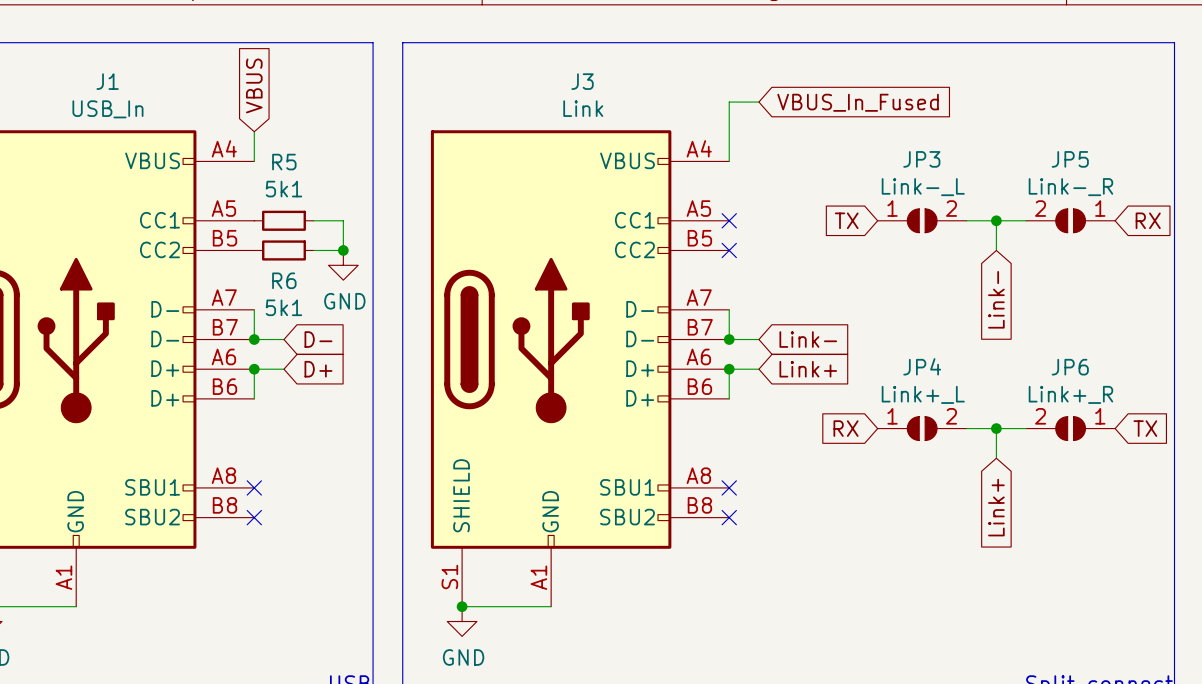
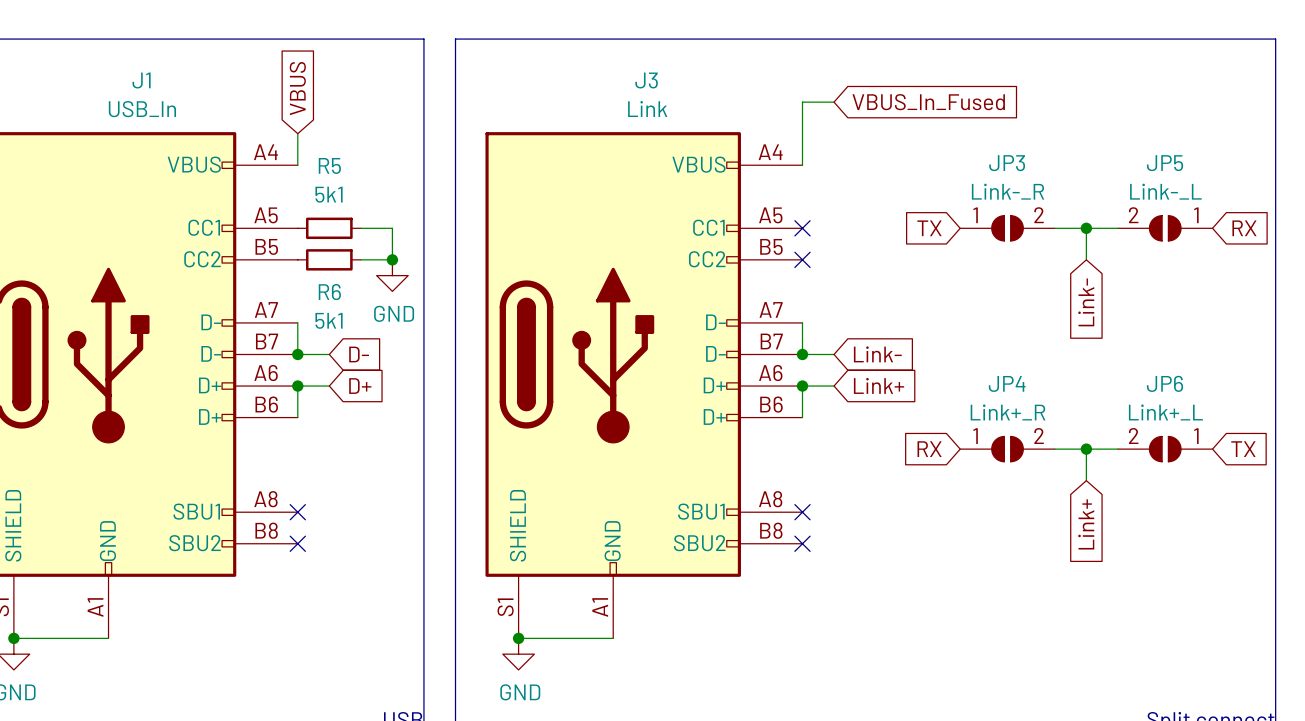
JP3 value: Link-_L (923, 187) -> Link-_R (1008, 191)
JP5 value: Link-_R (1070, 187) -> Link-_L (1165, 191)
JP4 value: Link+_L (923, 394) -> Link+_R (1008, 412)
JP6 value: Link+_R (1070, 394) -> Link+_L (1165, 412)

